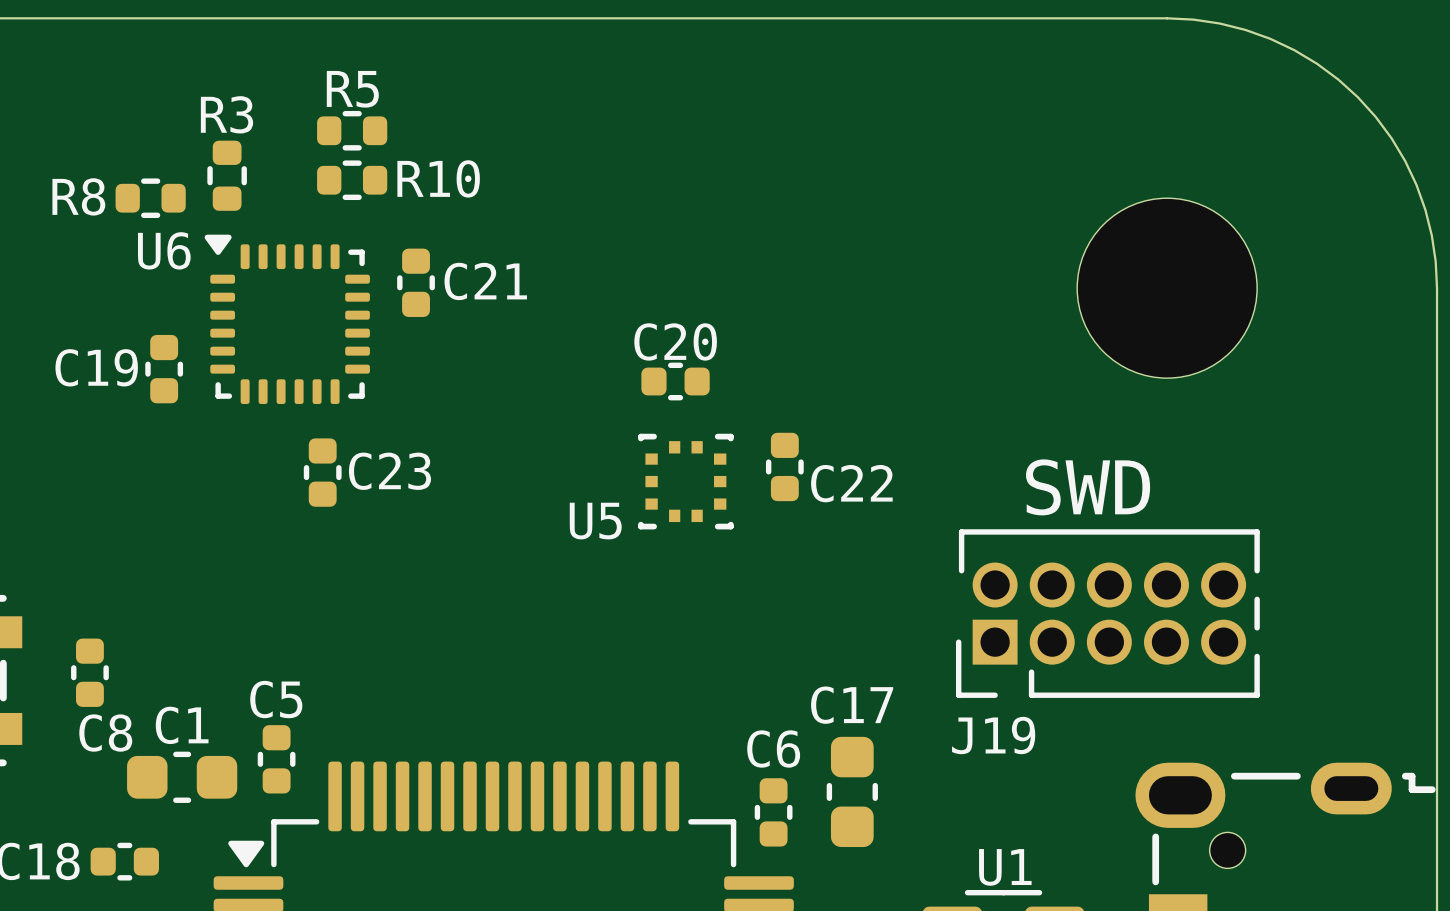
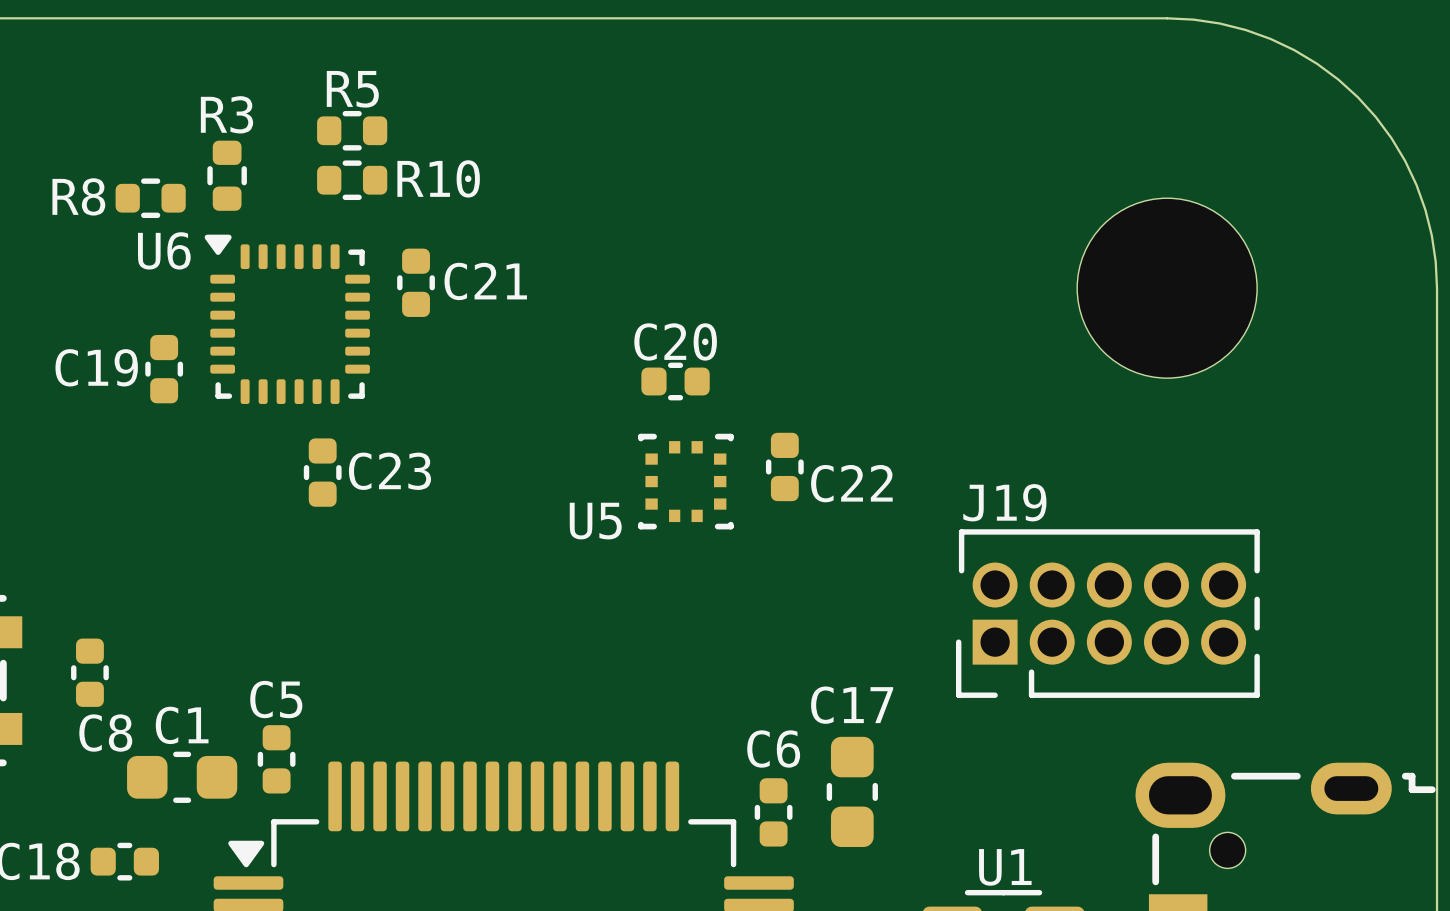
text: SWD (1088, 487) -> none
J19 name position: J19 (993, 735) -> J19 (1004, 502)

